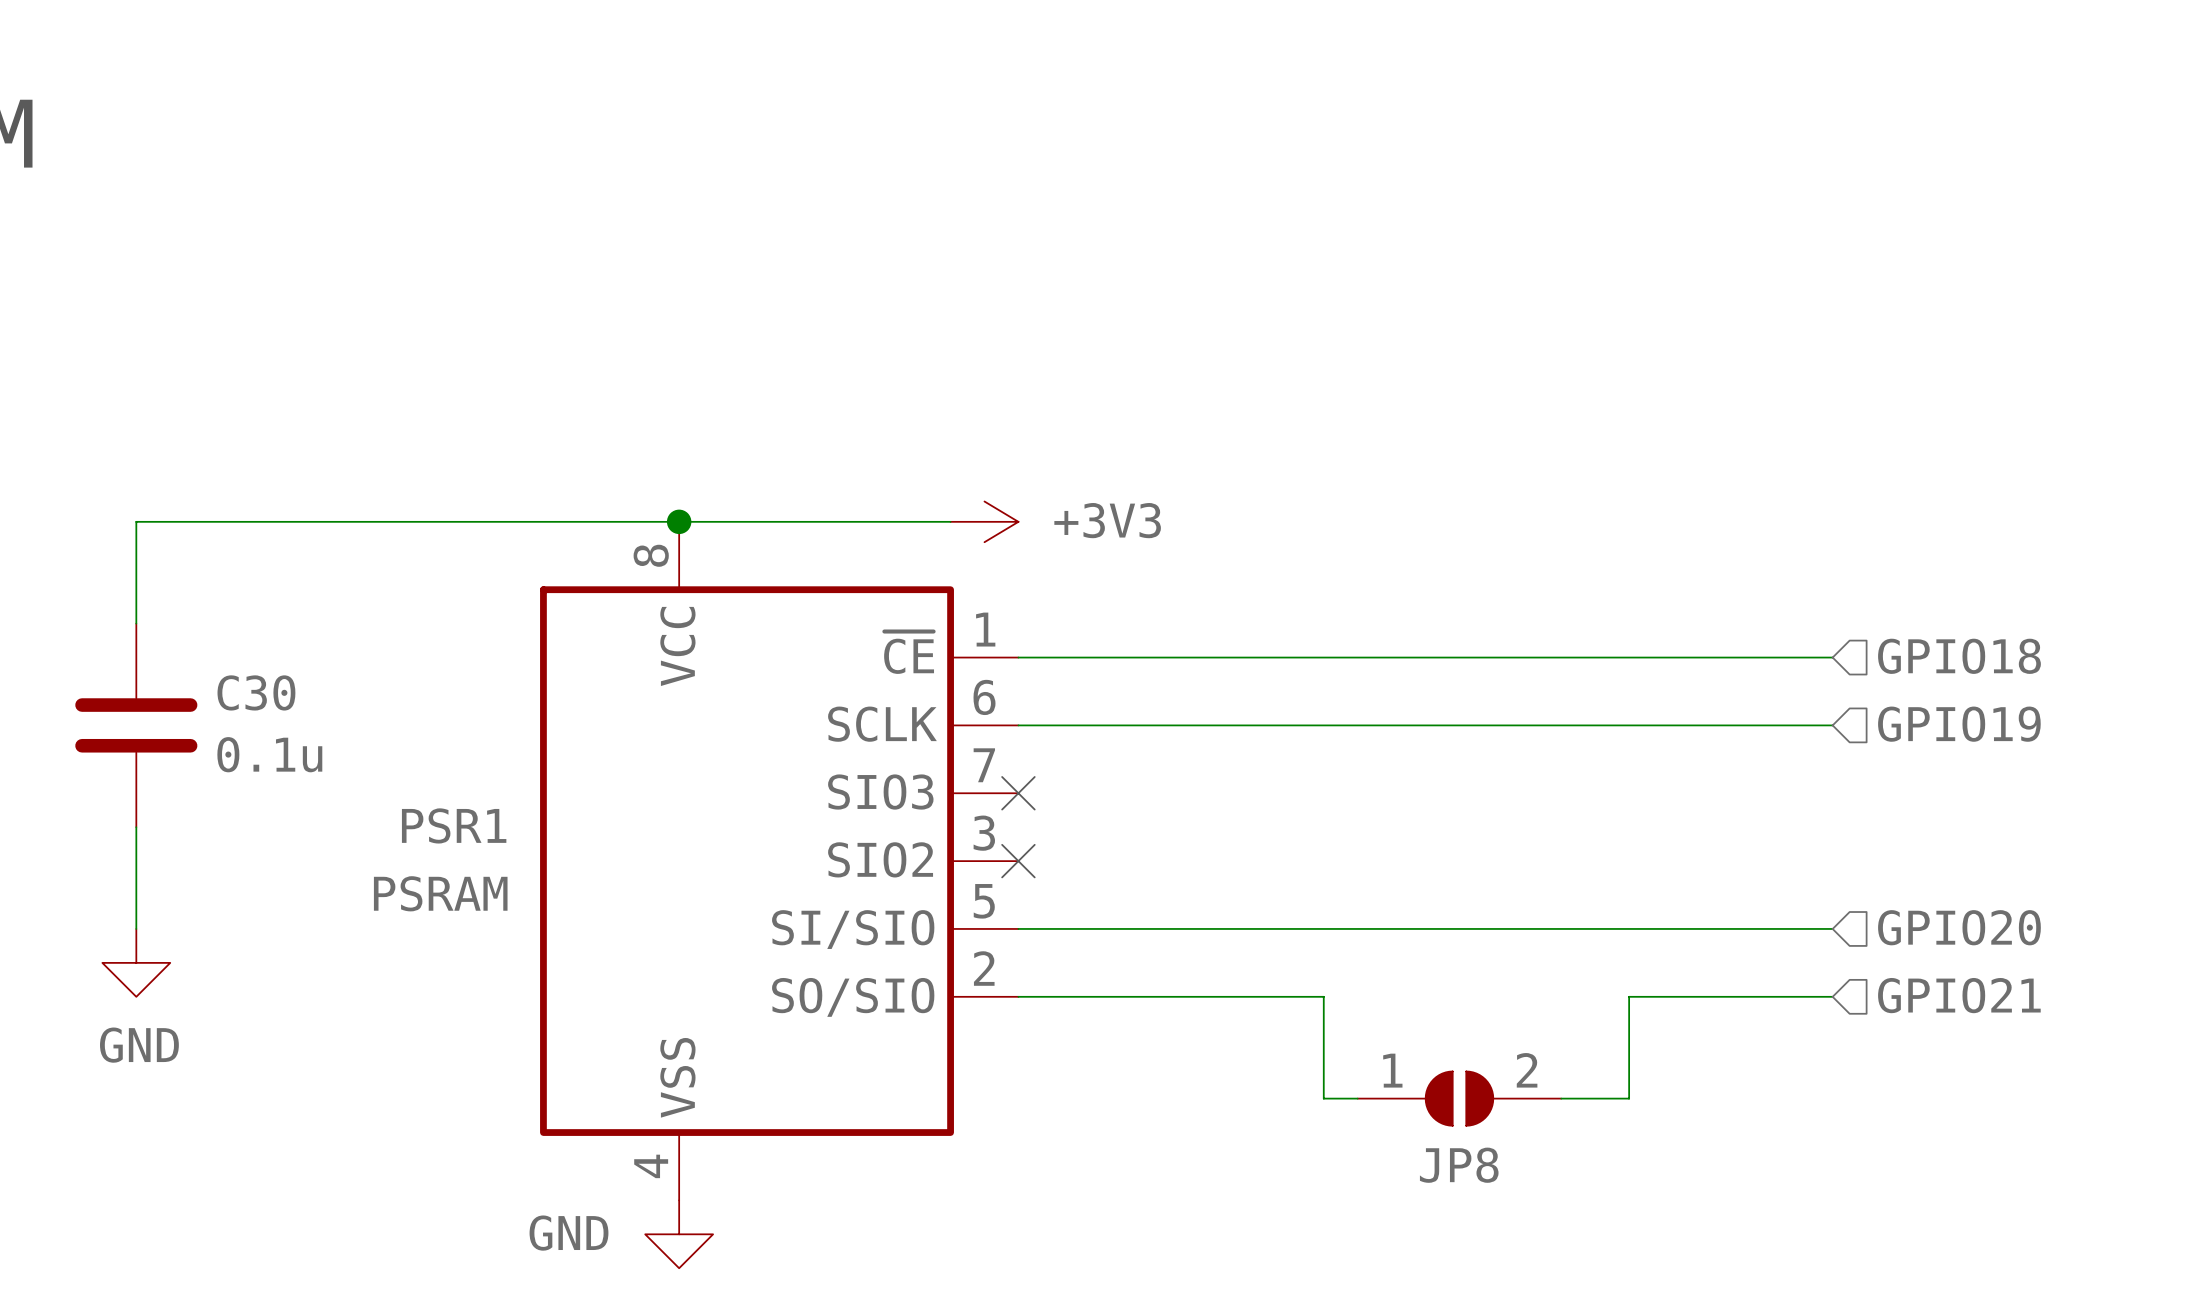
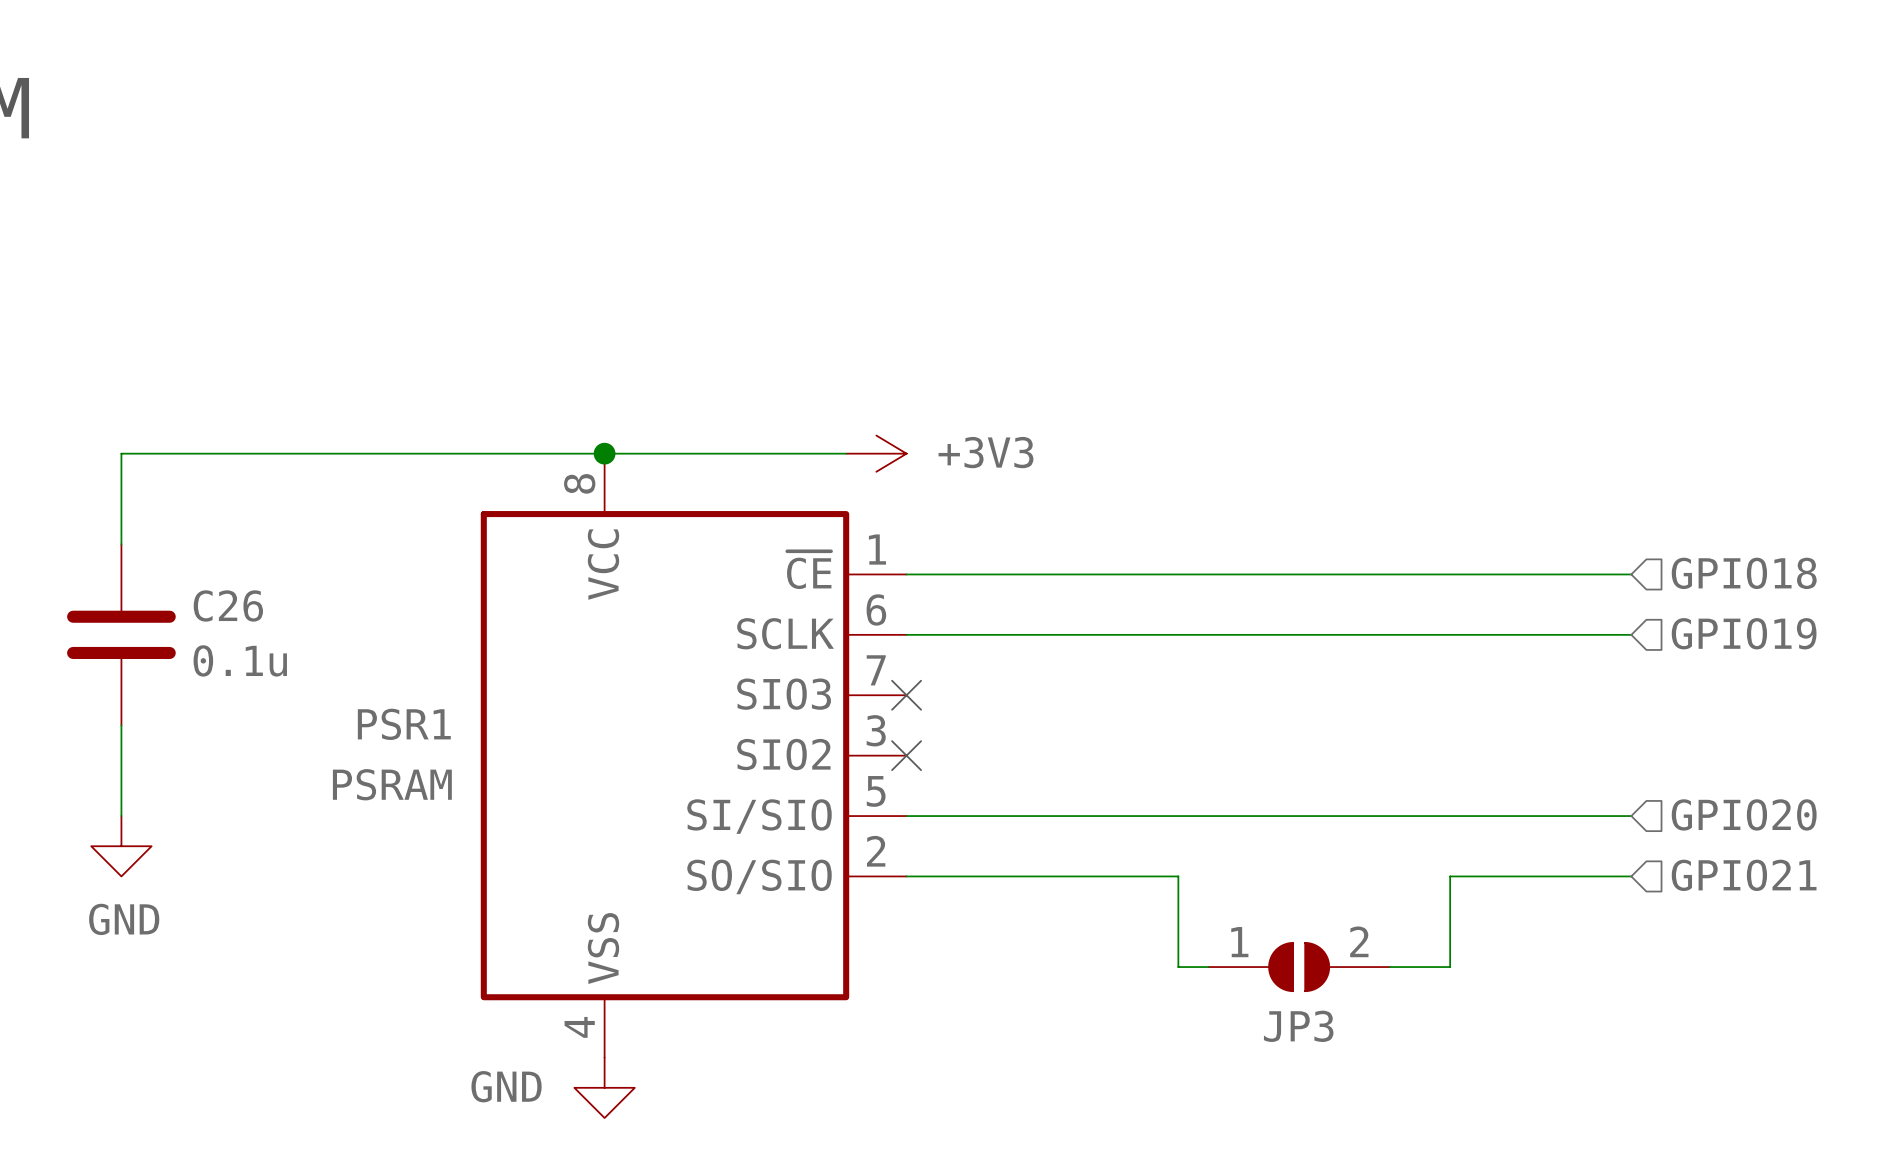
C30 name: C30 (256, 692) -> C26 (228, 605)
JP8 name: JP8 (1459, 1165) -> JP3 (1298, 1026)

